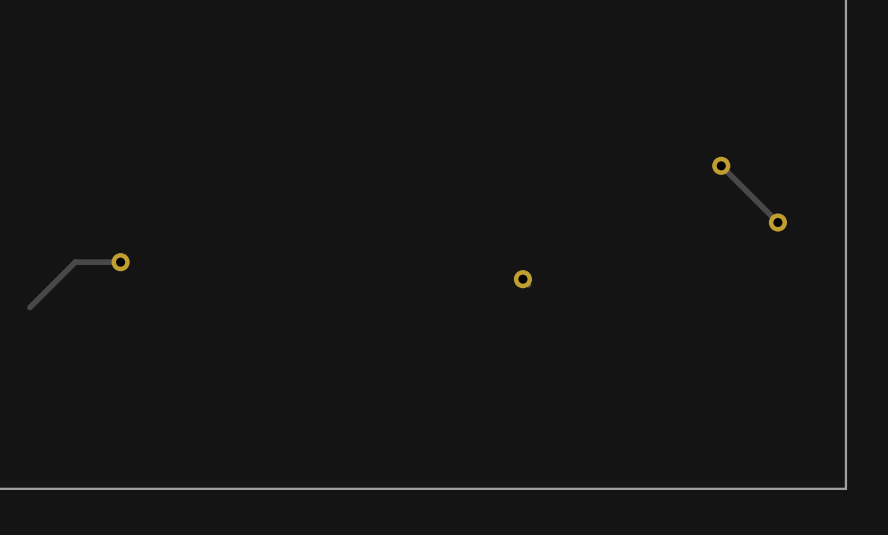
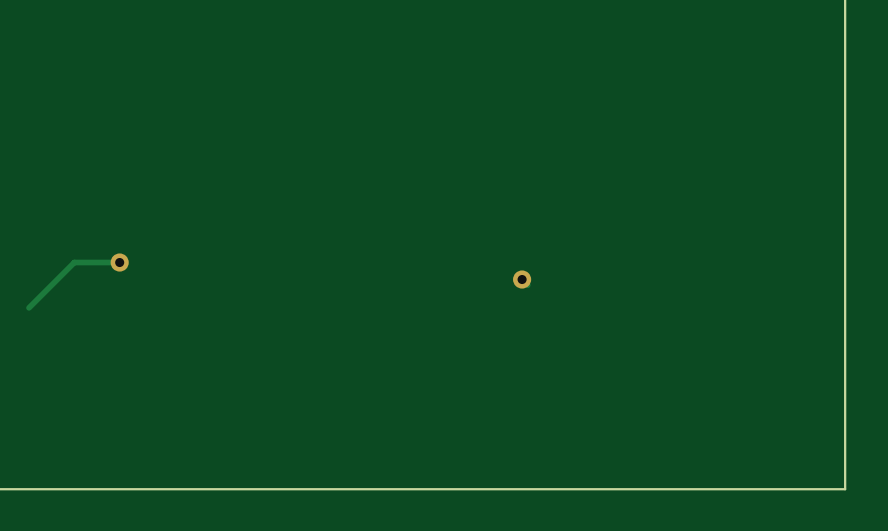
track: (721, 165) (777, 222) -> none
via: (721, 165) -> none
via: (777, 222) -> none

